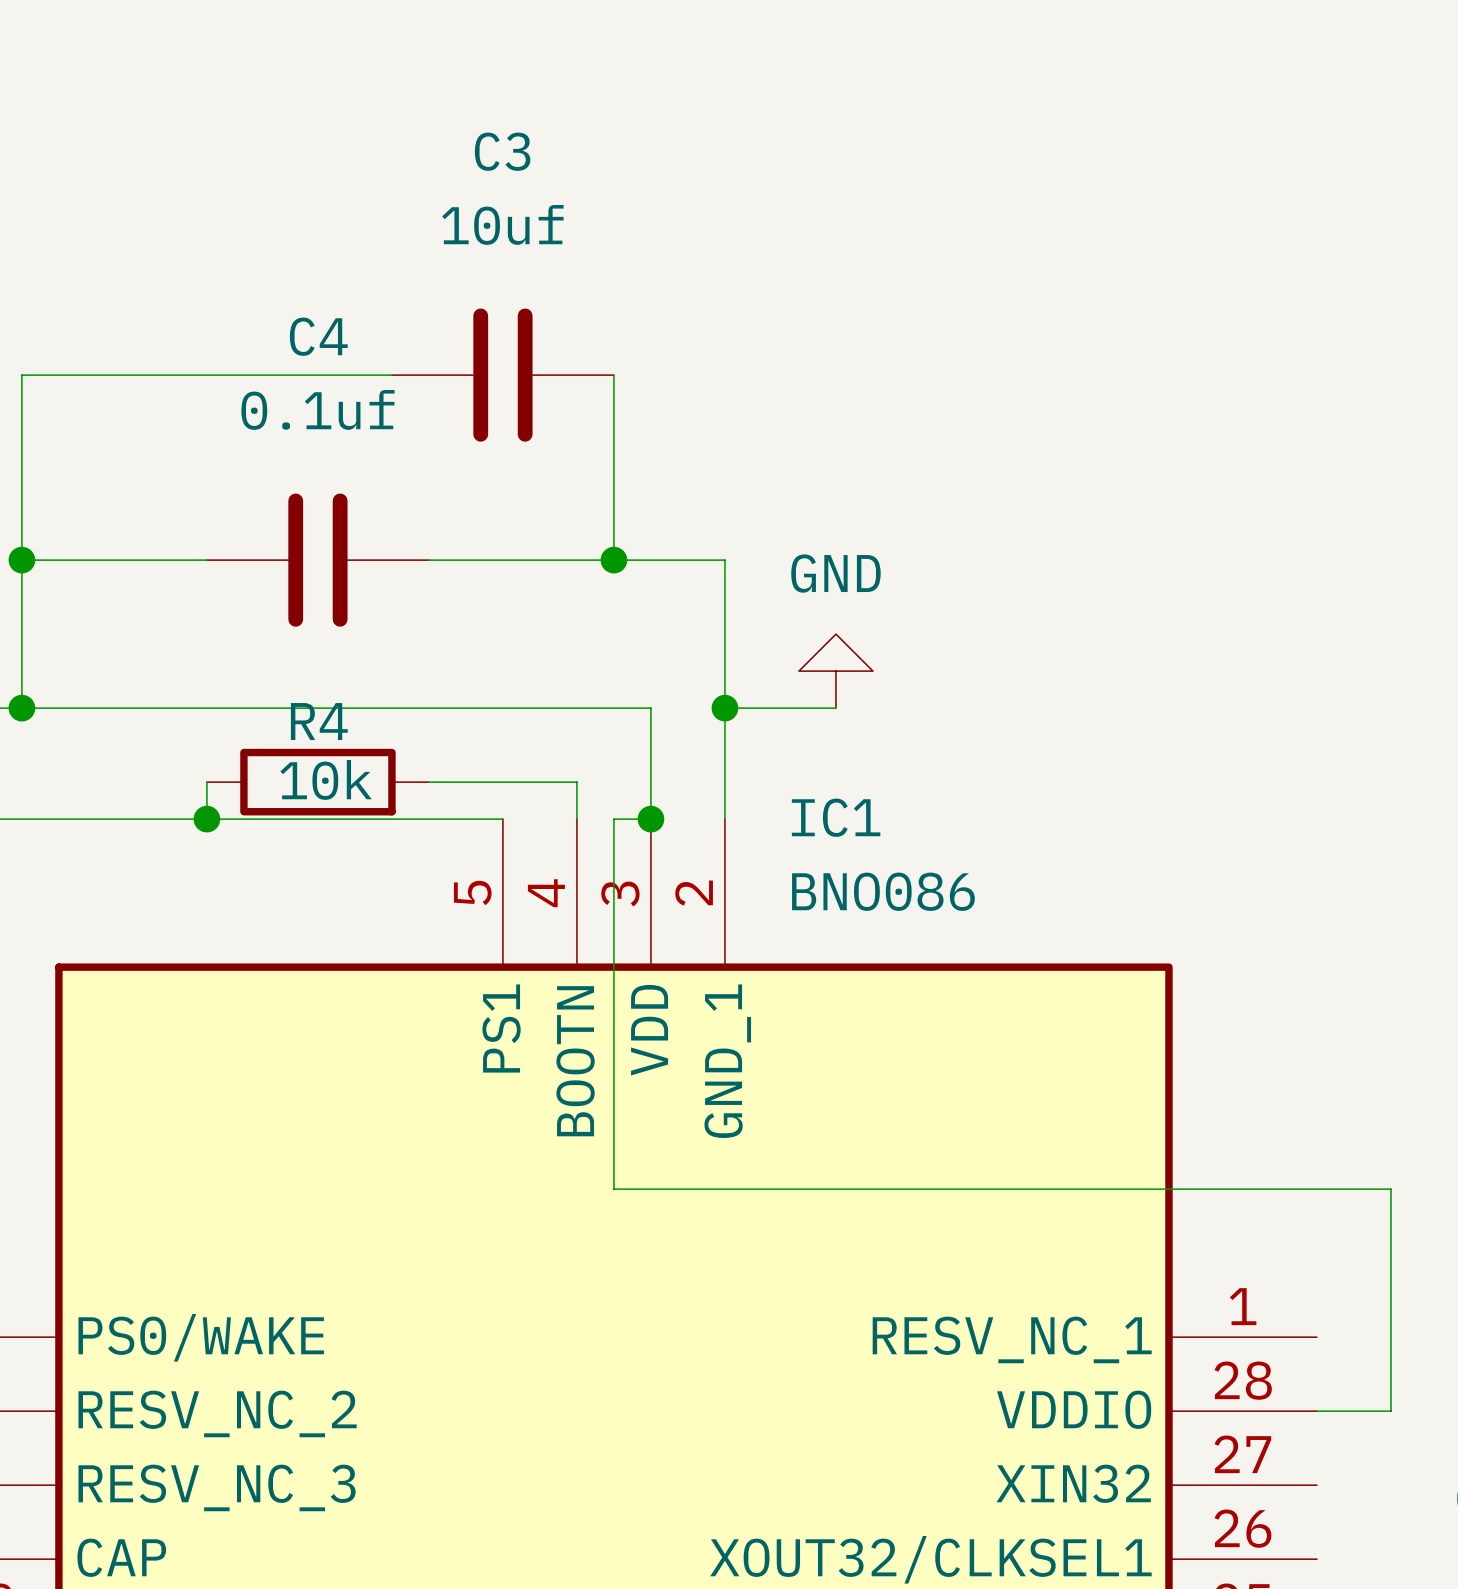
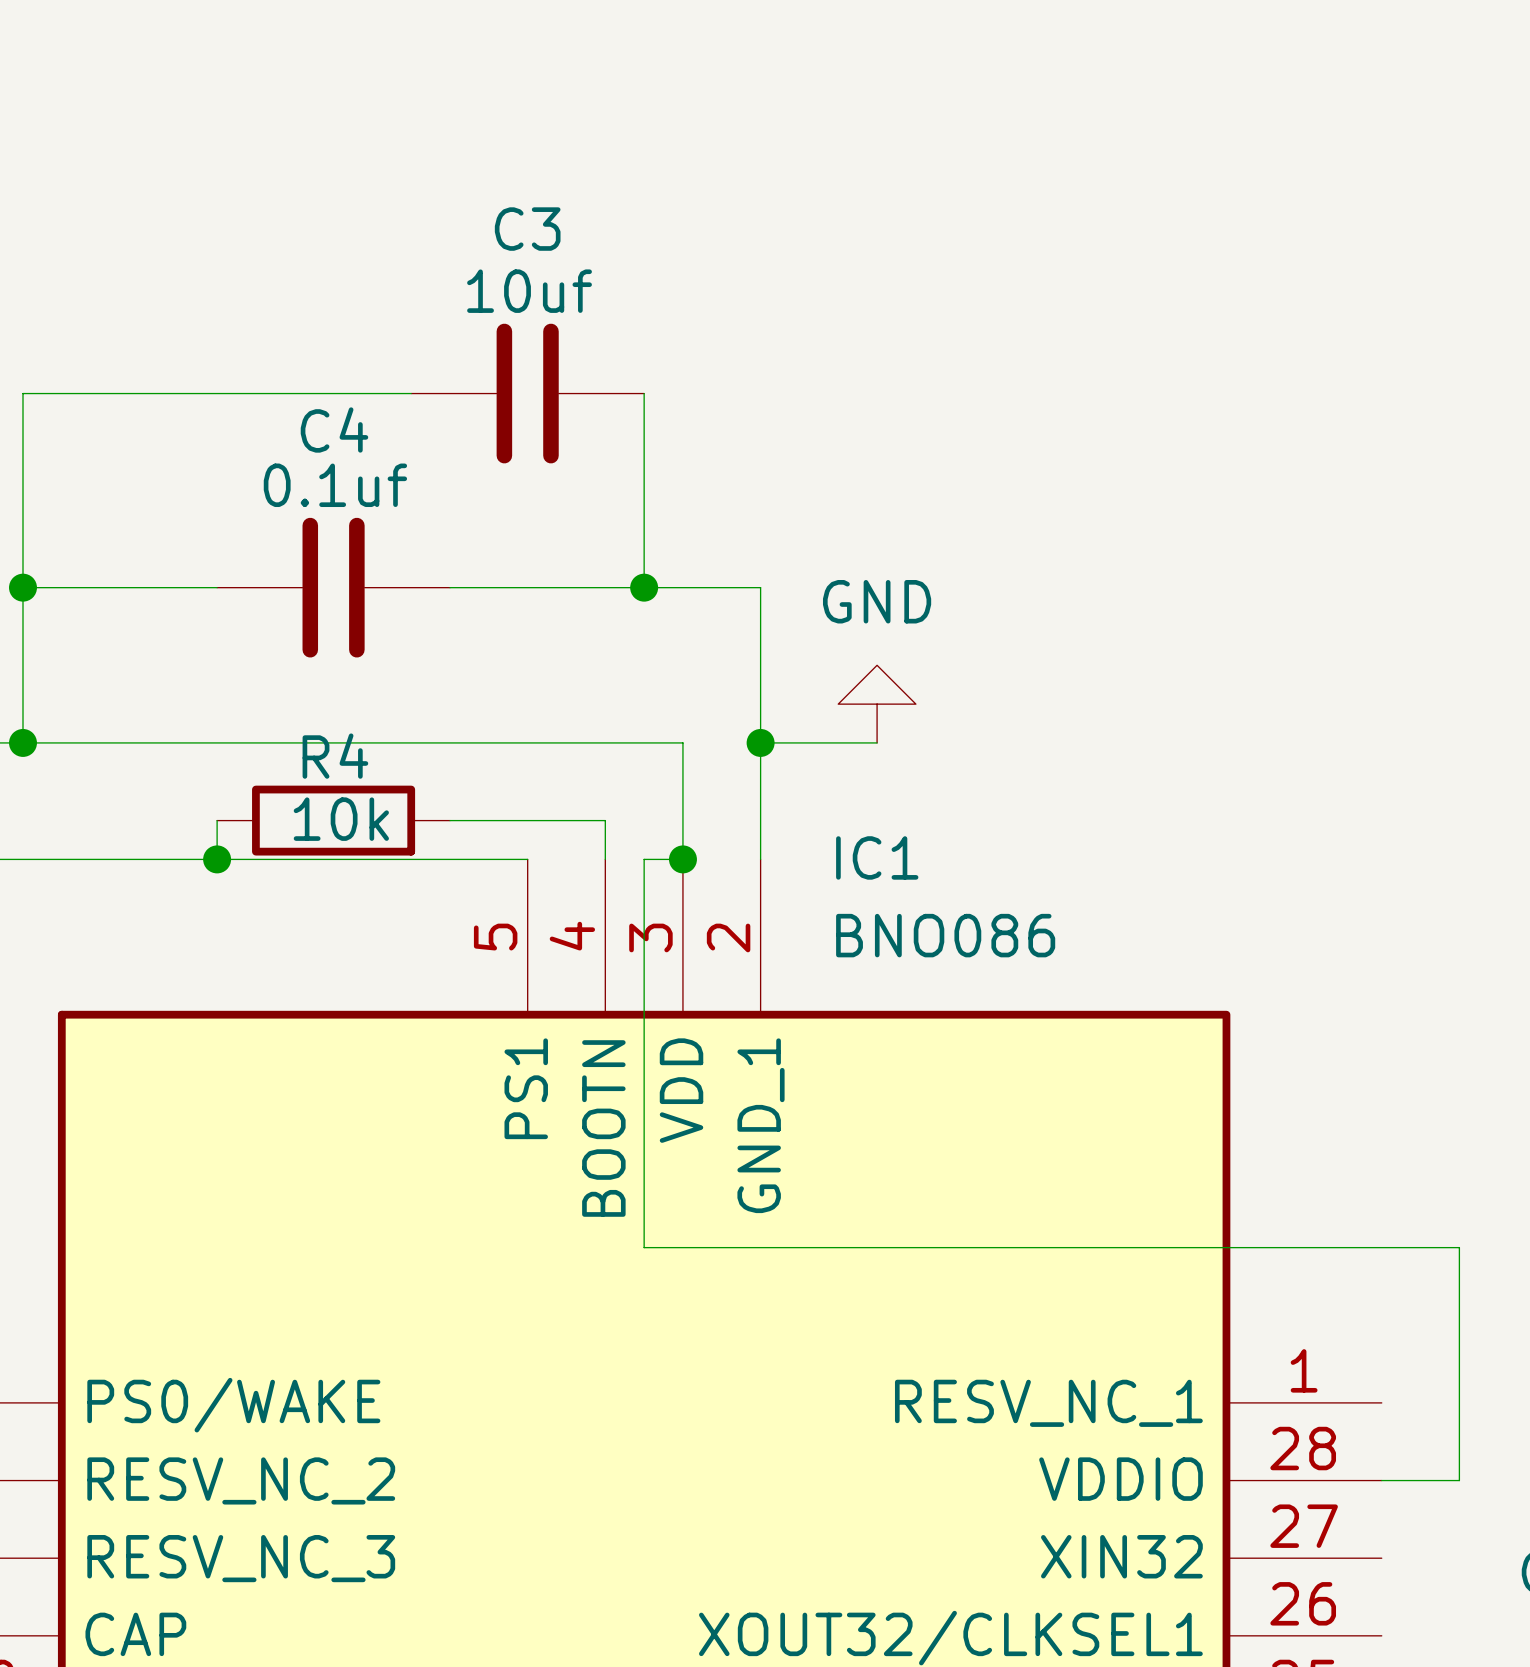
C3 name position: C3 (502, 151) -> C3 (527, 229)
C3 value position: 10uf (502, 224) -> 10uf (529, 291)
C4 name position: C4 (318, 336) -> C4 (334, 430)
C4 value position: 0.1uf (317, 409) -> 0.1uf (335, 485)

